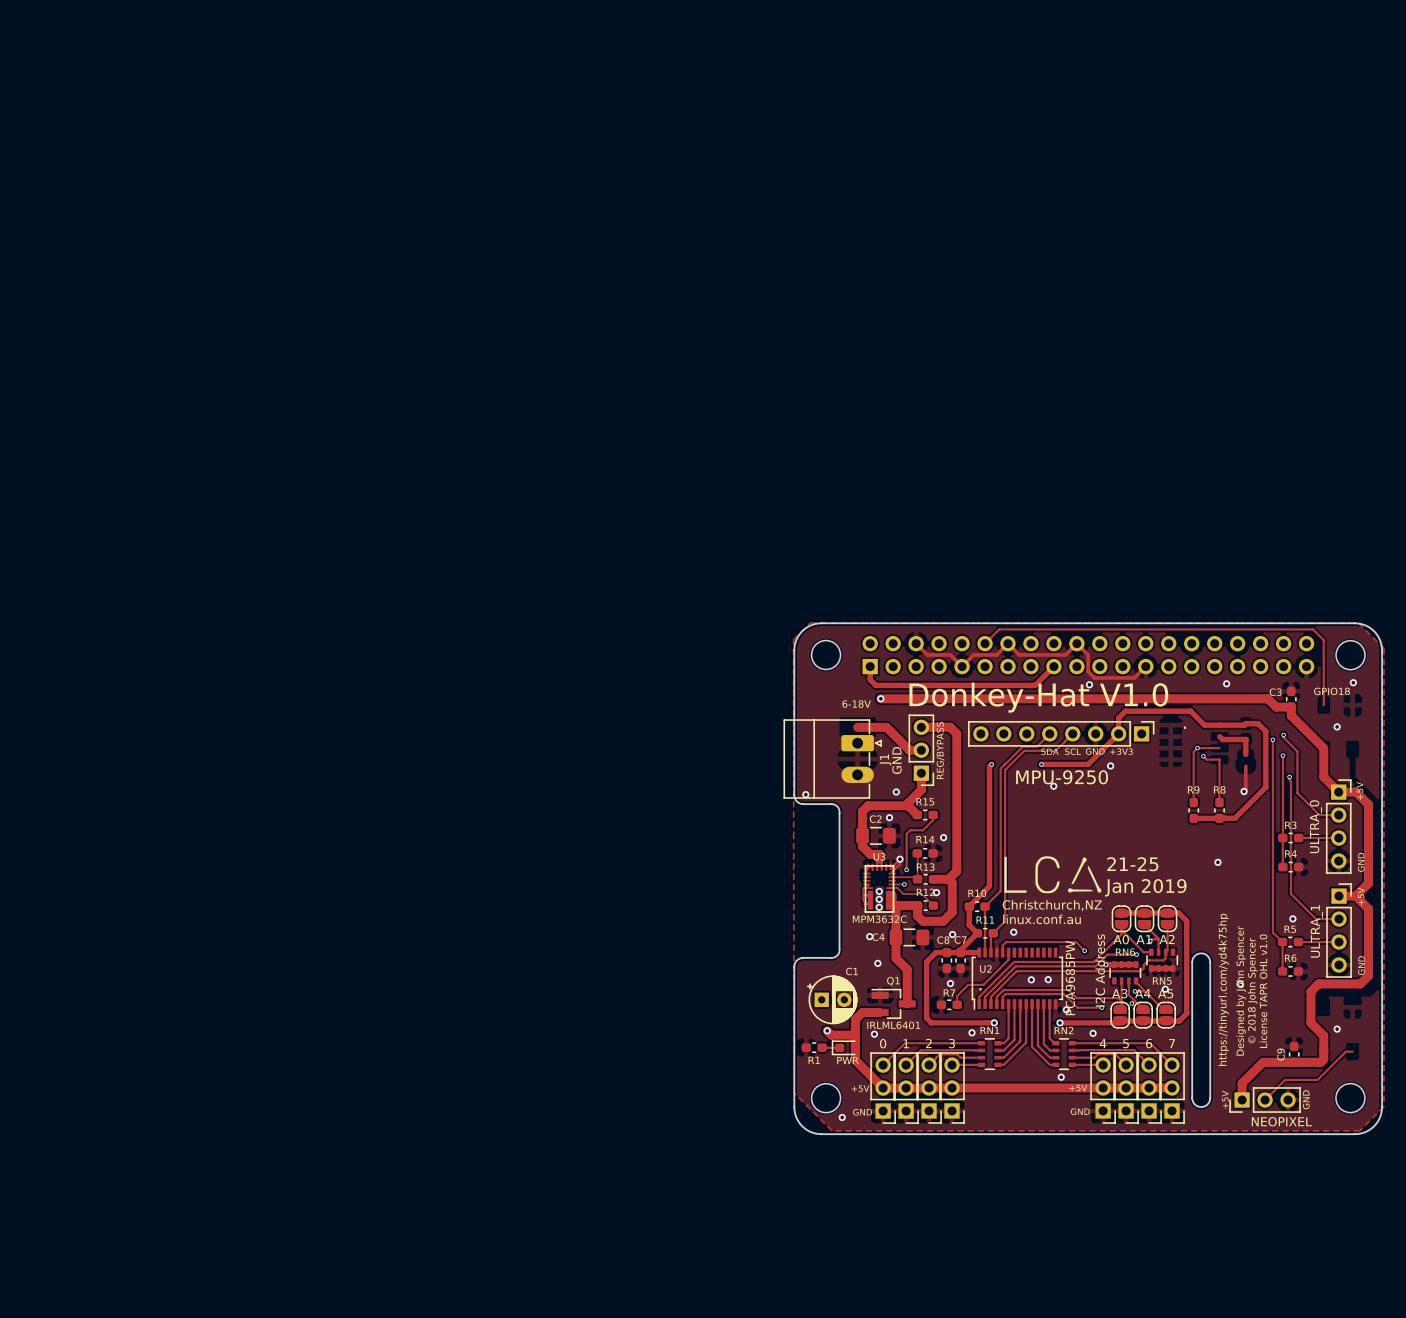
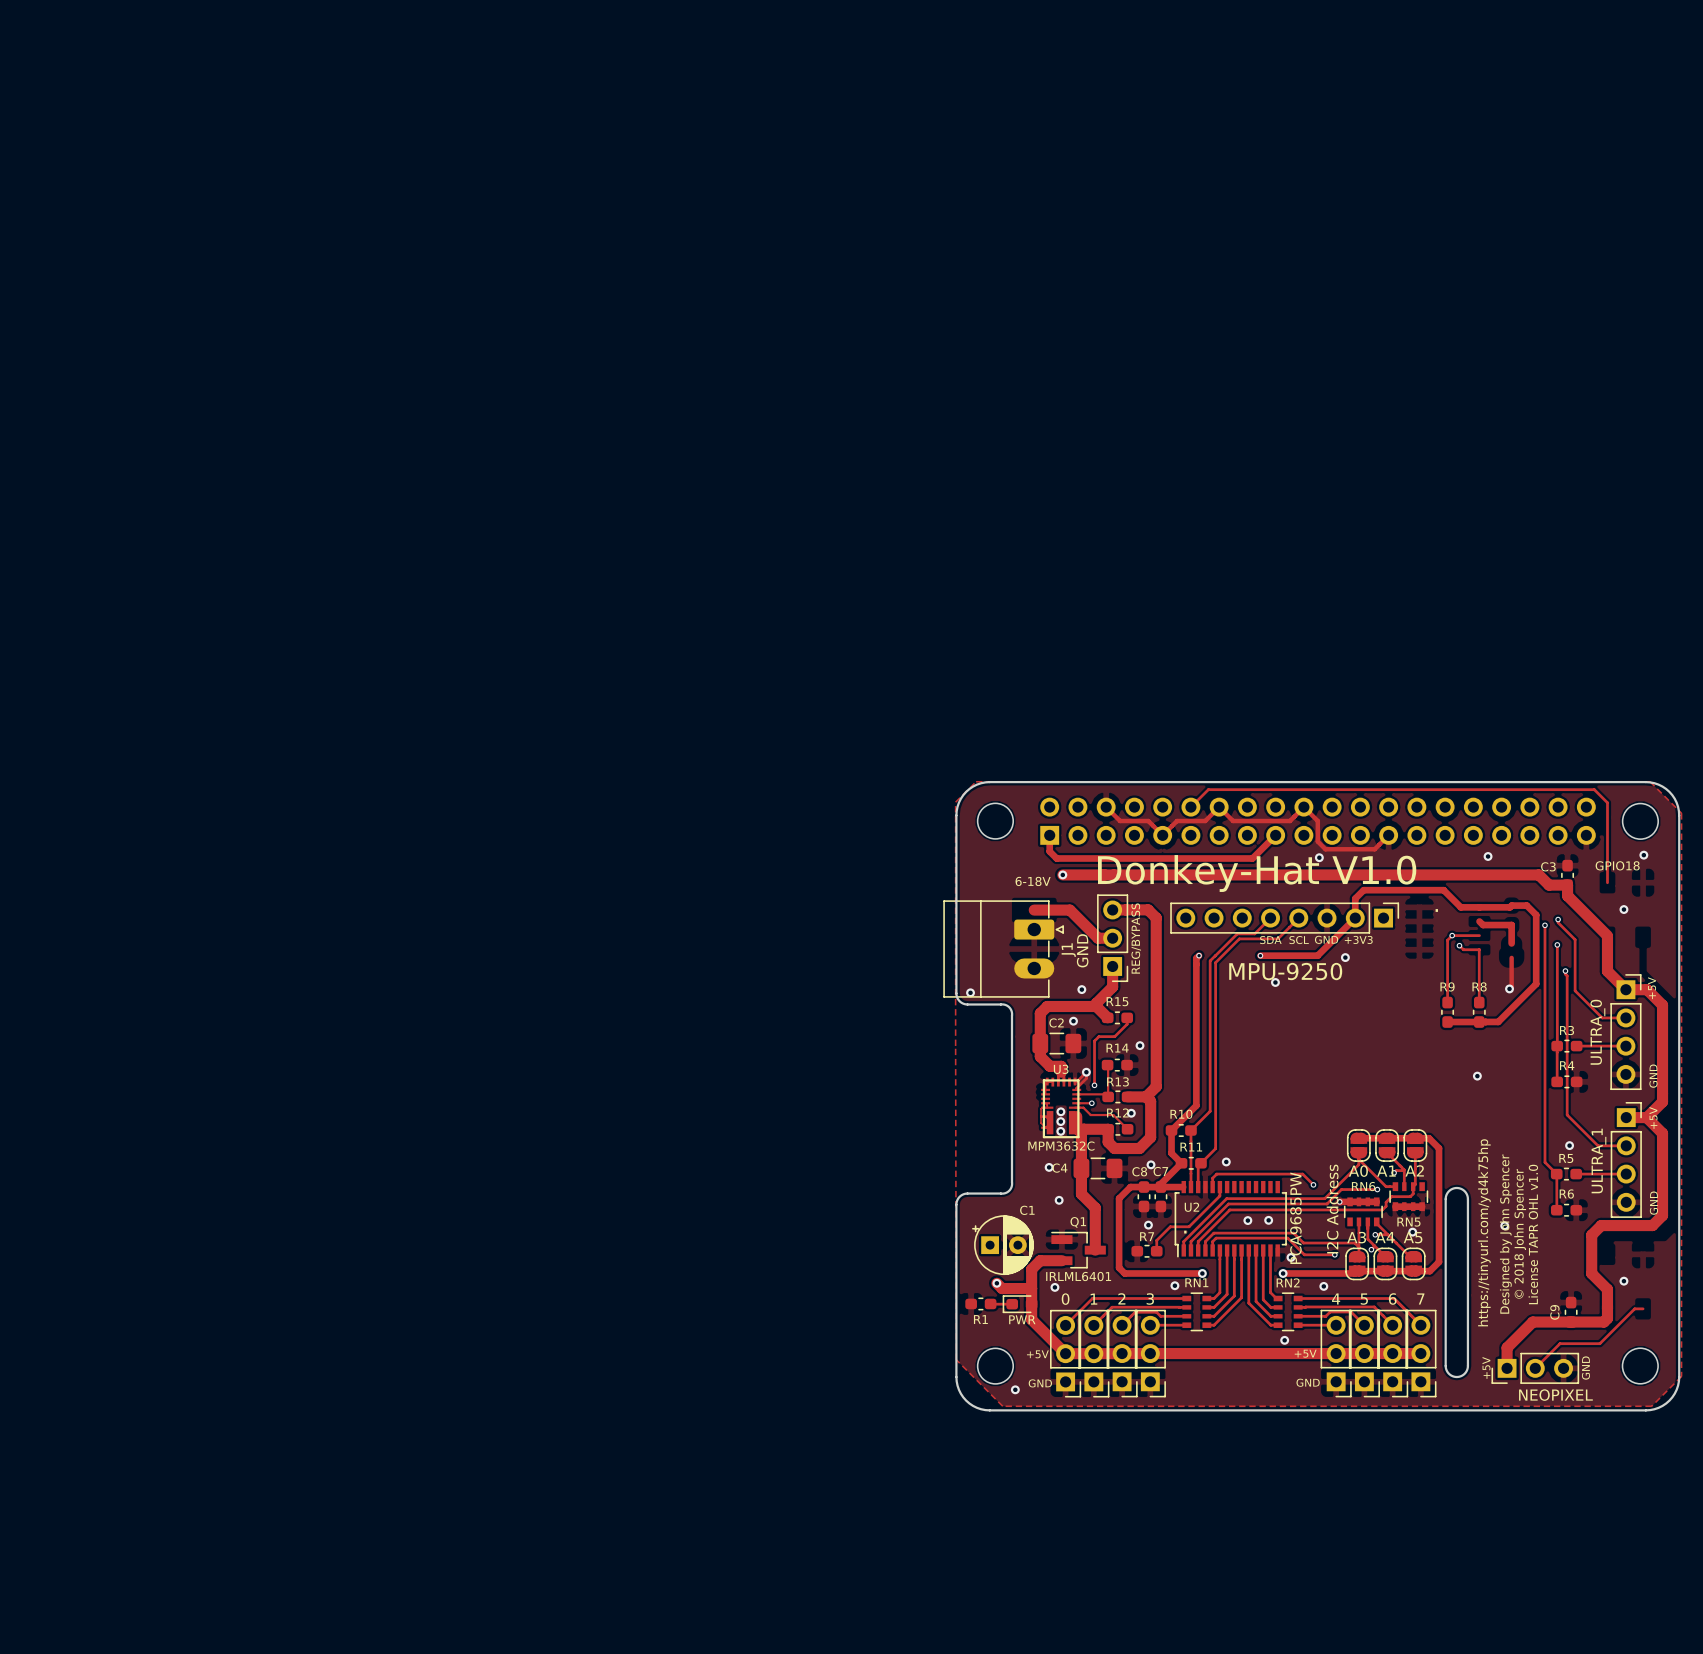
drawing: [1004, 856, 1102, 894] -> none
text: 21-25 (1132, 864) -> none
text: Jan 2019 (1145, 887) -> none
text: Christchurch,NZ (1052, 905) -> none
text: linux.conf.au (1042, 919) -> none

